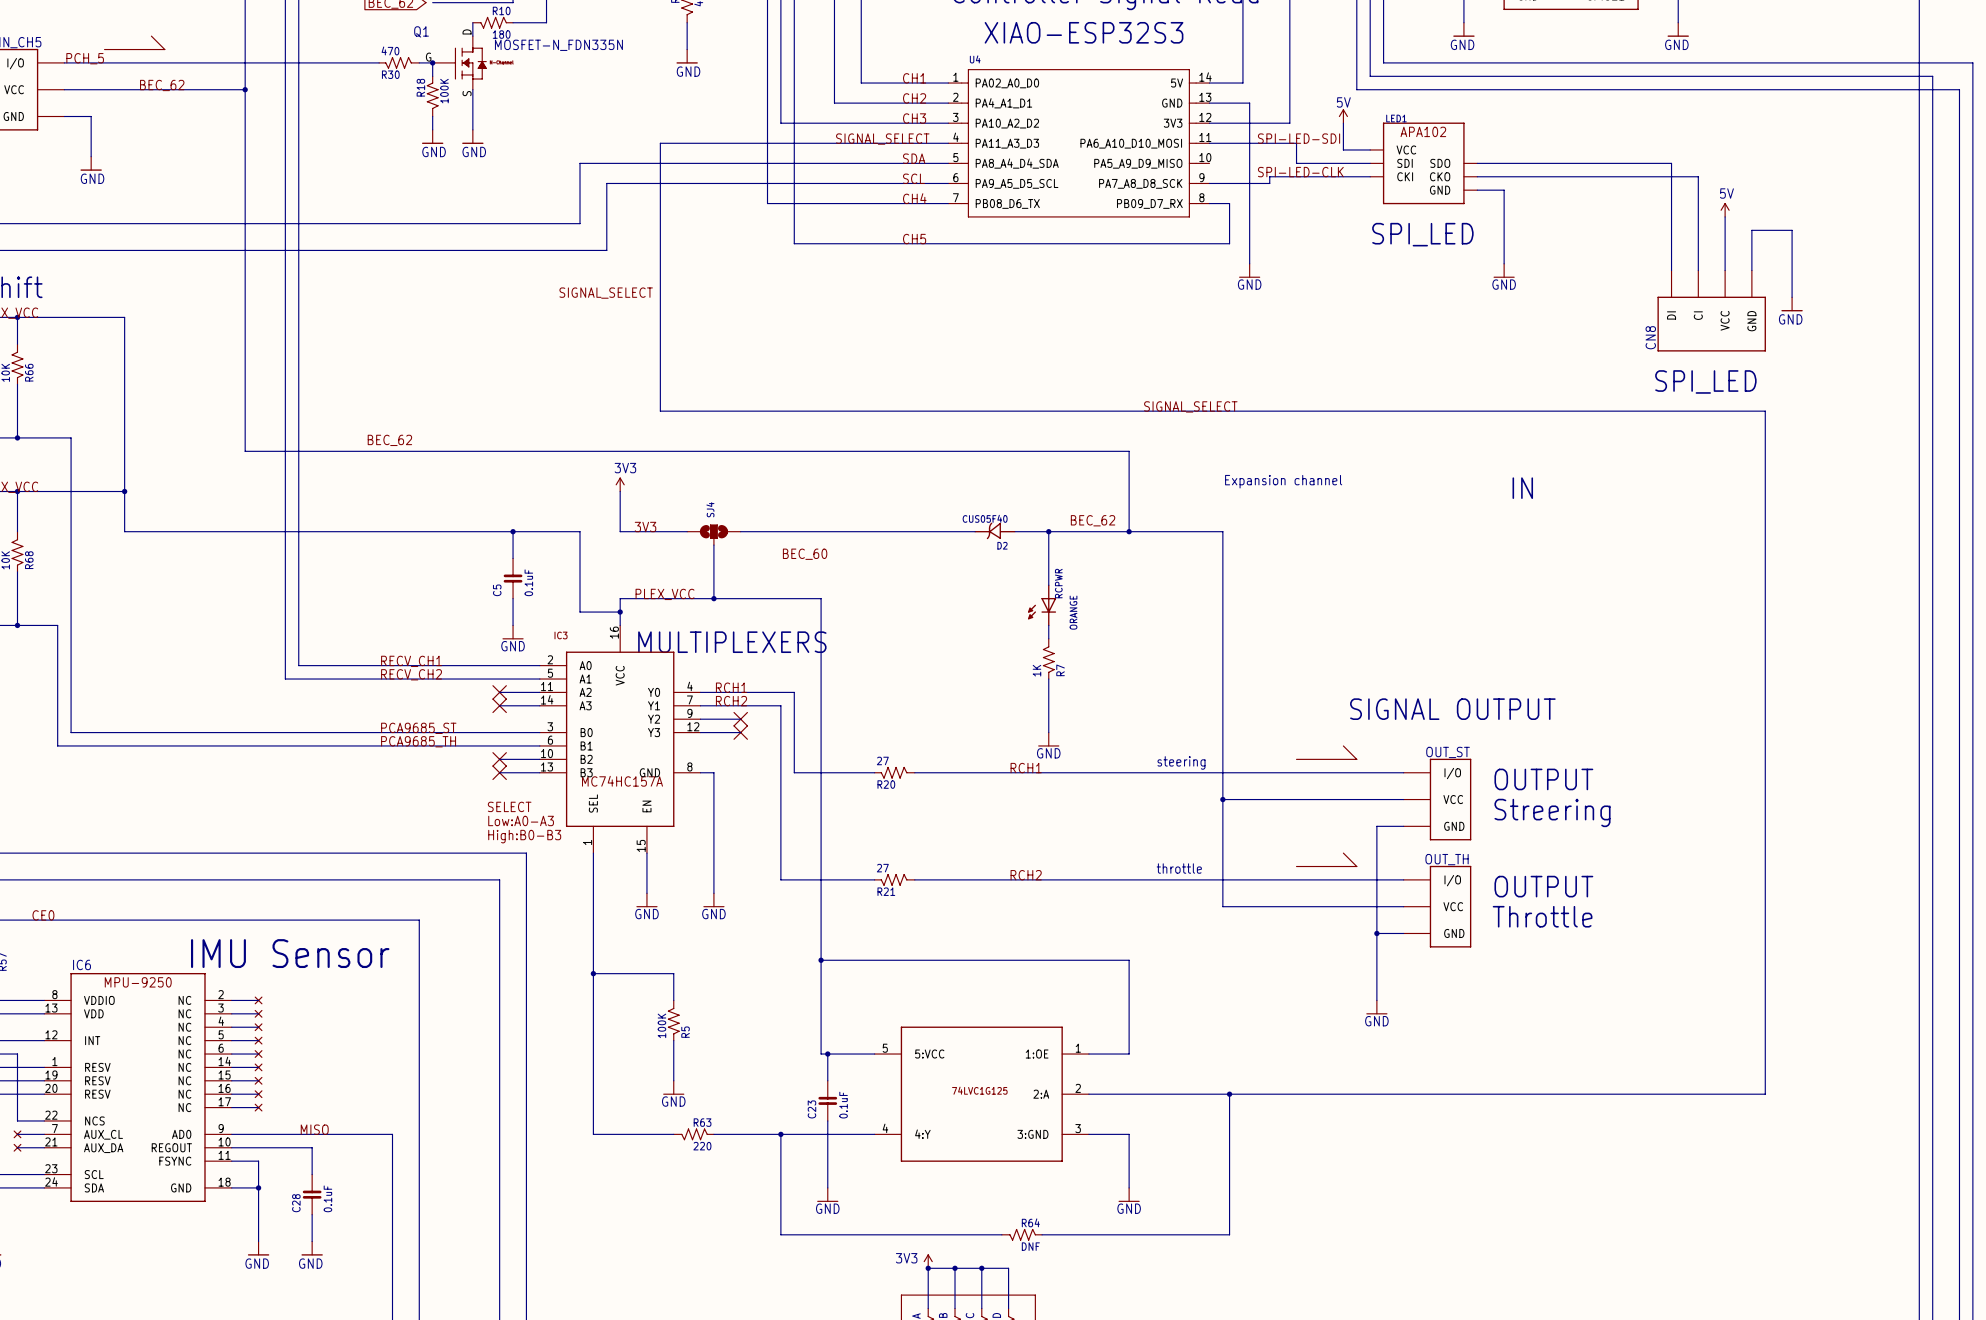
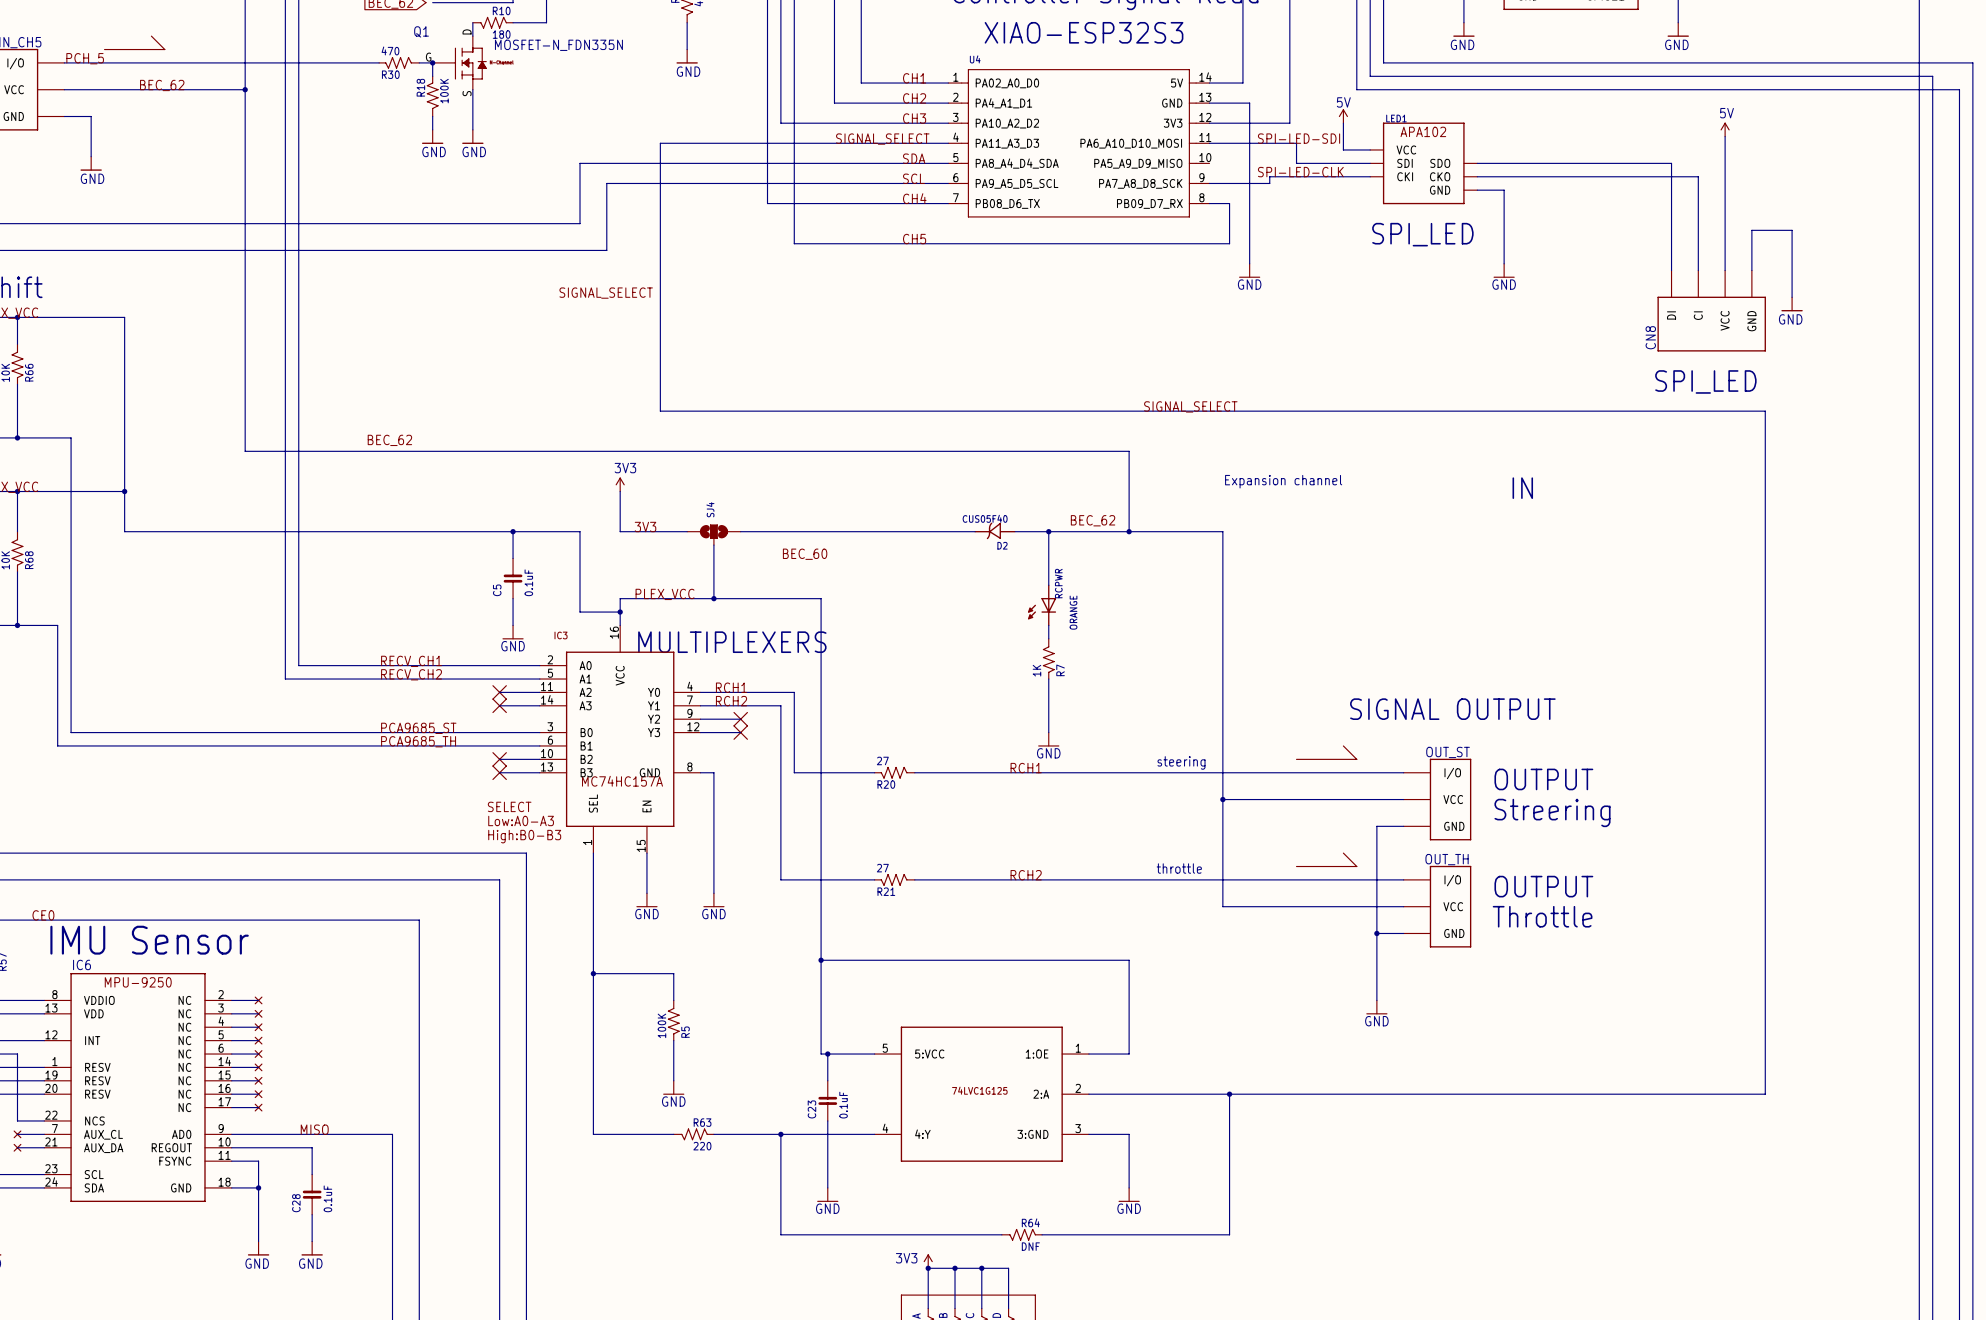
wire: none -> (1725, 136) (1725, 216)
power symbol position: 5V (1725, 209) -> 5V (1725, 129)
text: none -> IMU Sensor (149, 940)
text: IMU Sensor (290, 953) -> none

